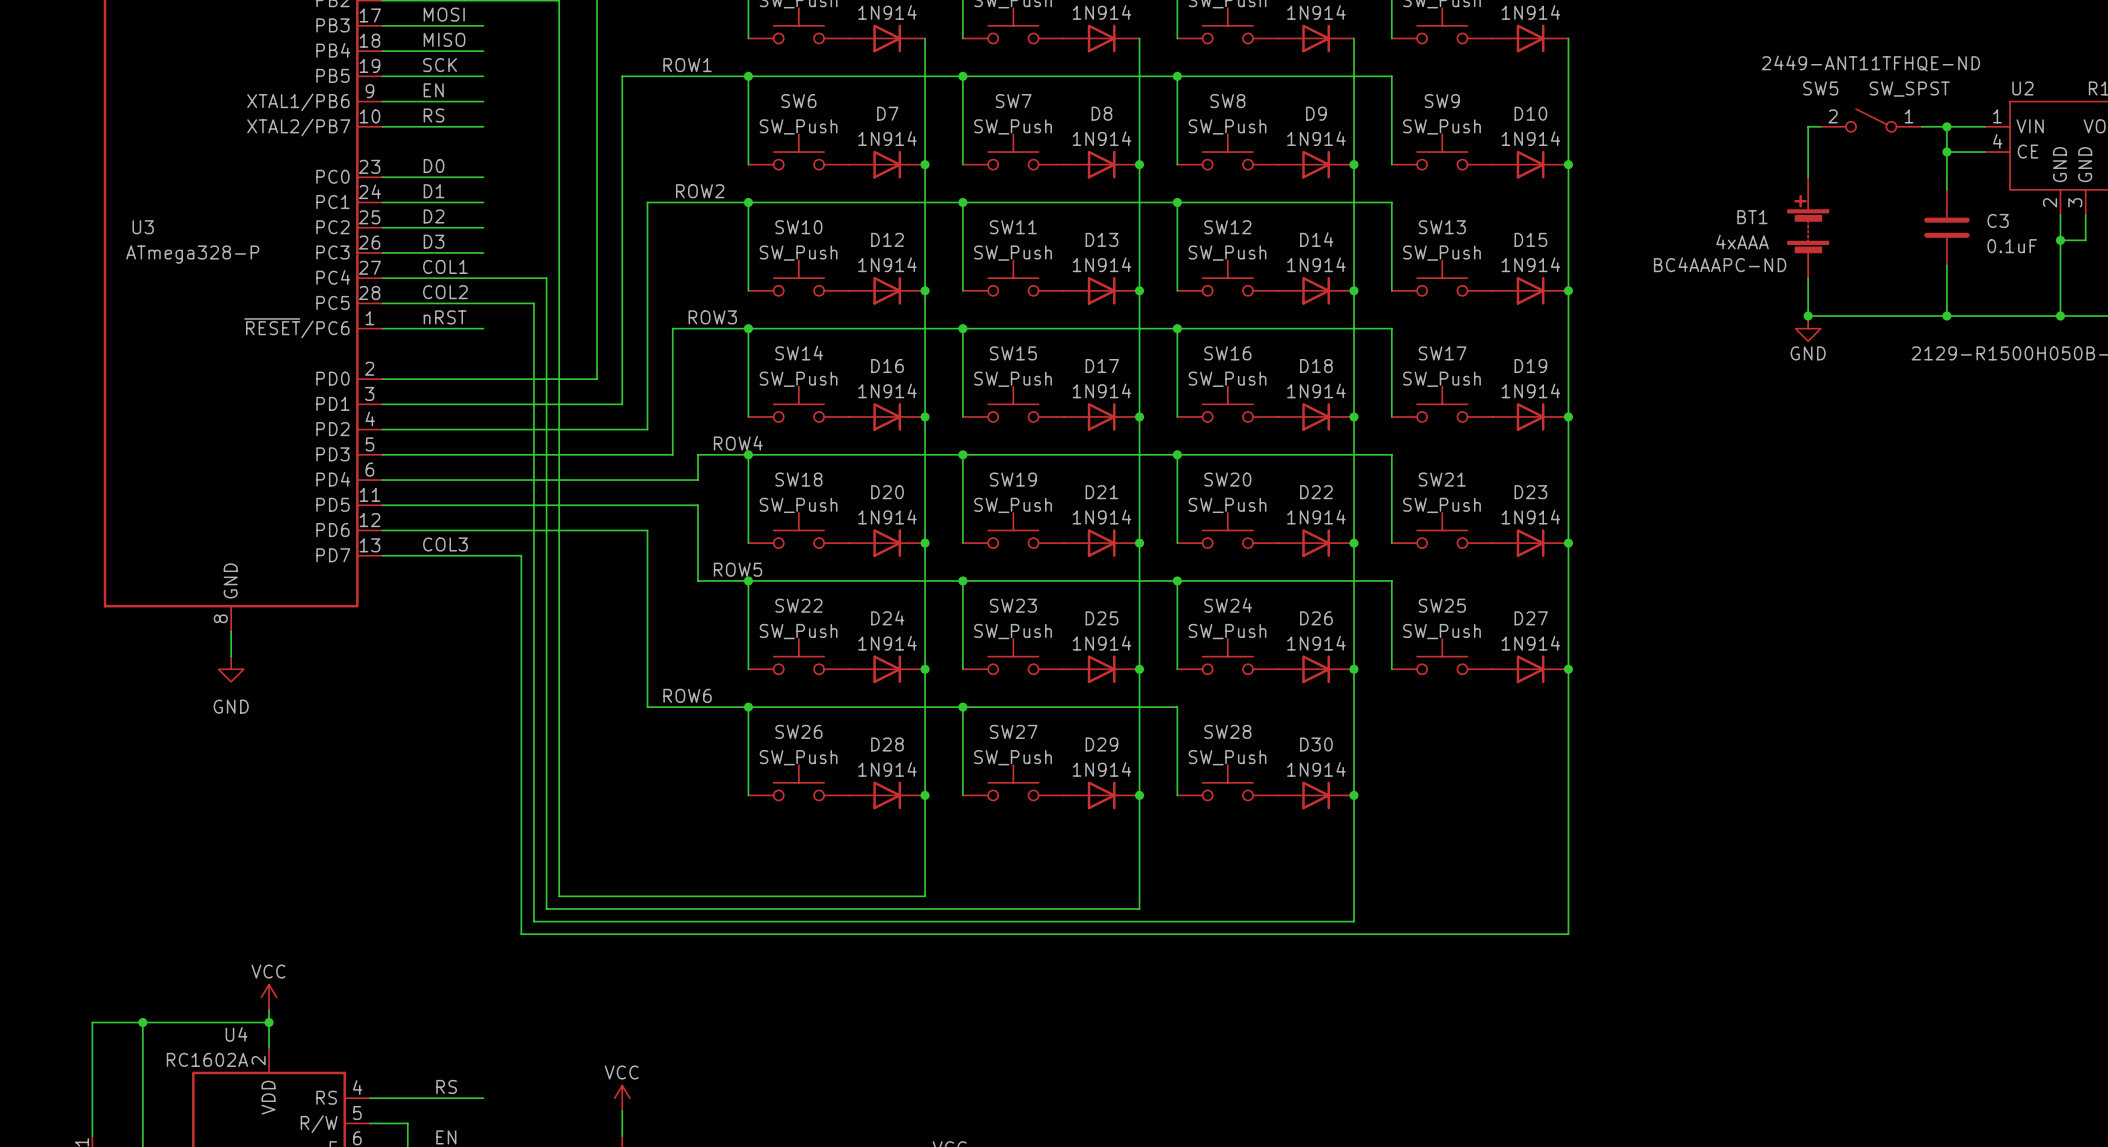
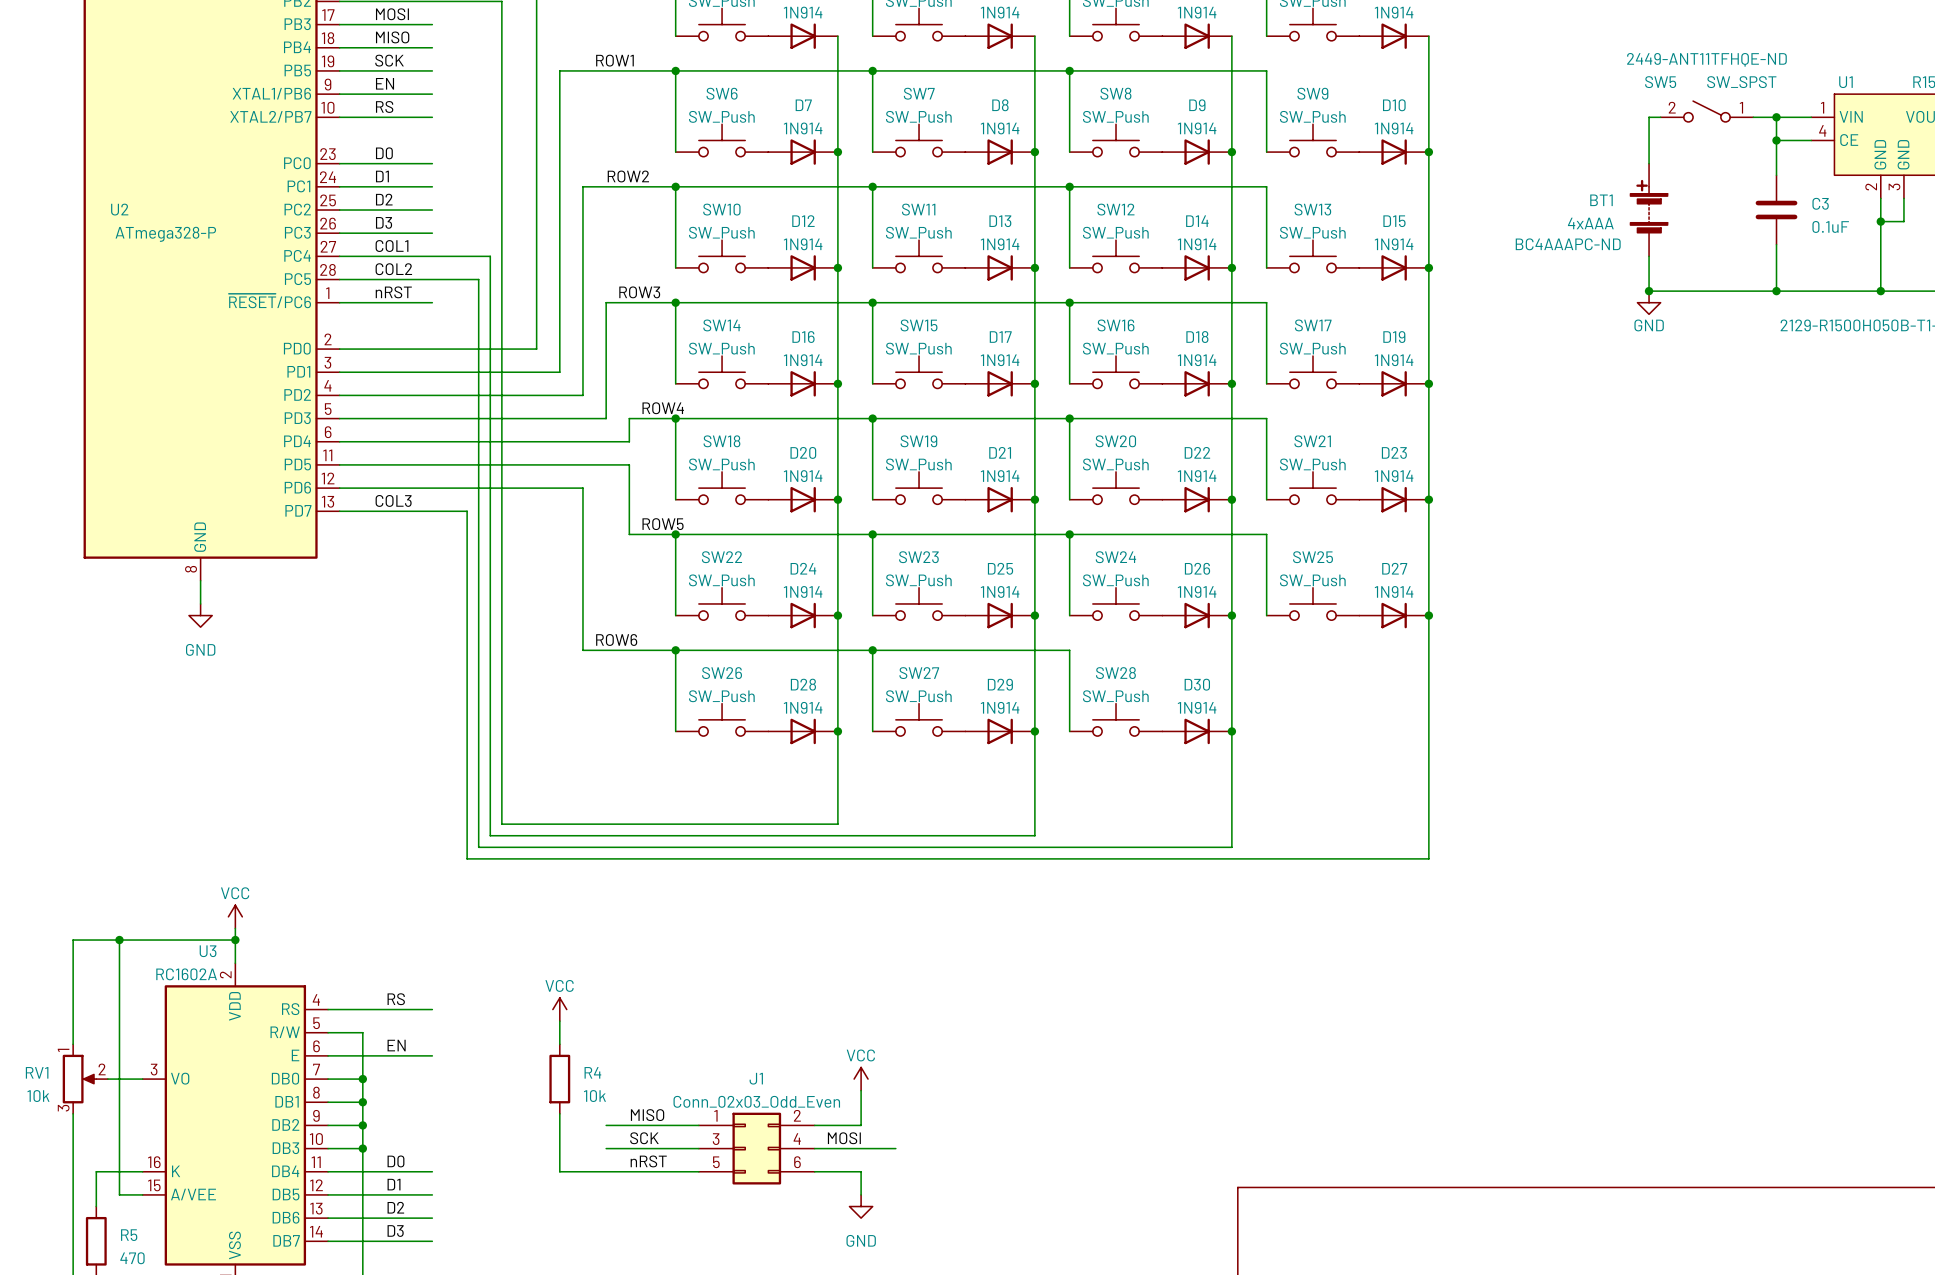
U2 name: U2 (2022, 88) -> U1 (1845, 82)
U3 name: U3 (143, 227) -> U2 (119, 209)
U4 name: U4 (236, 1034) -> U3 (208, 951)

